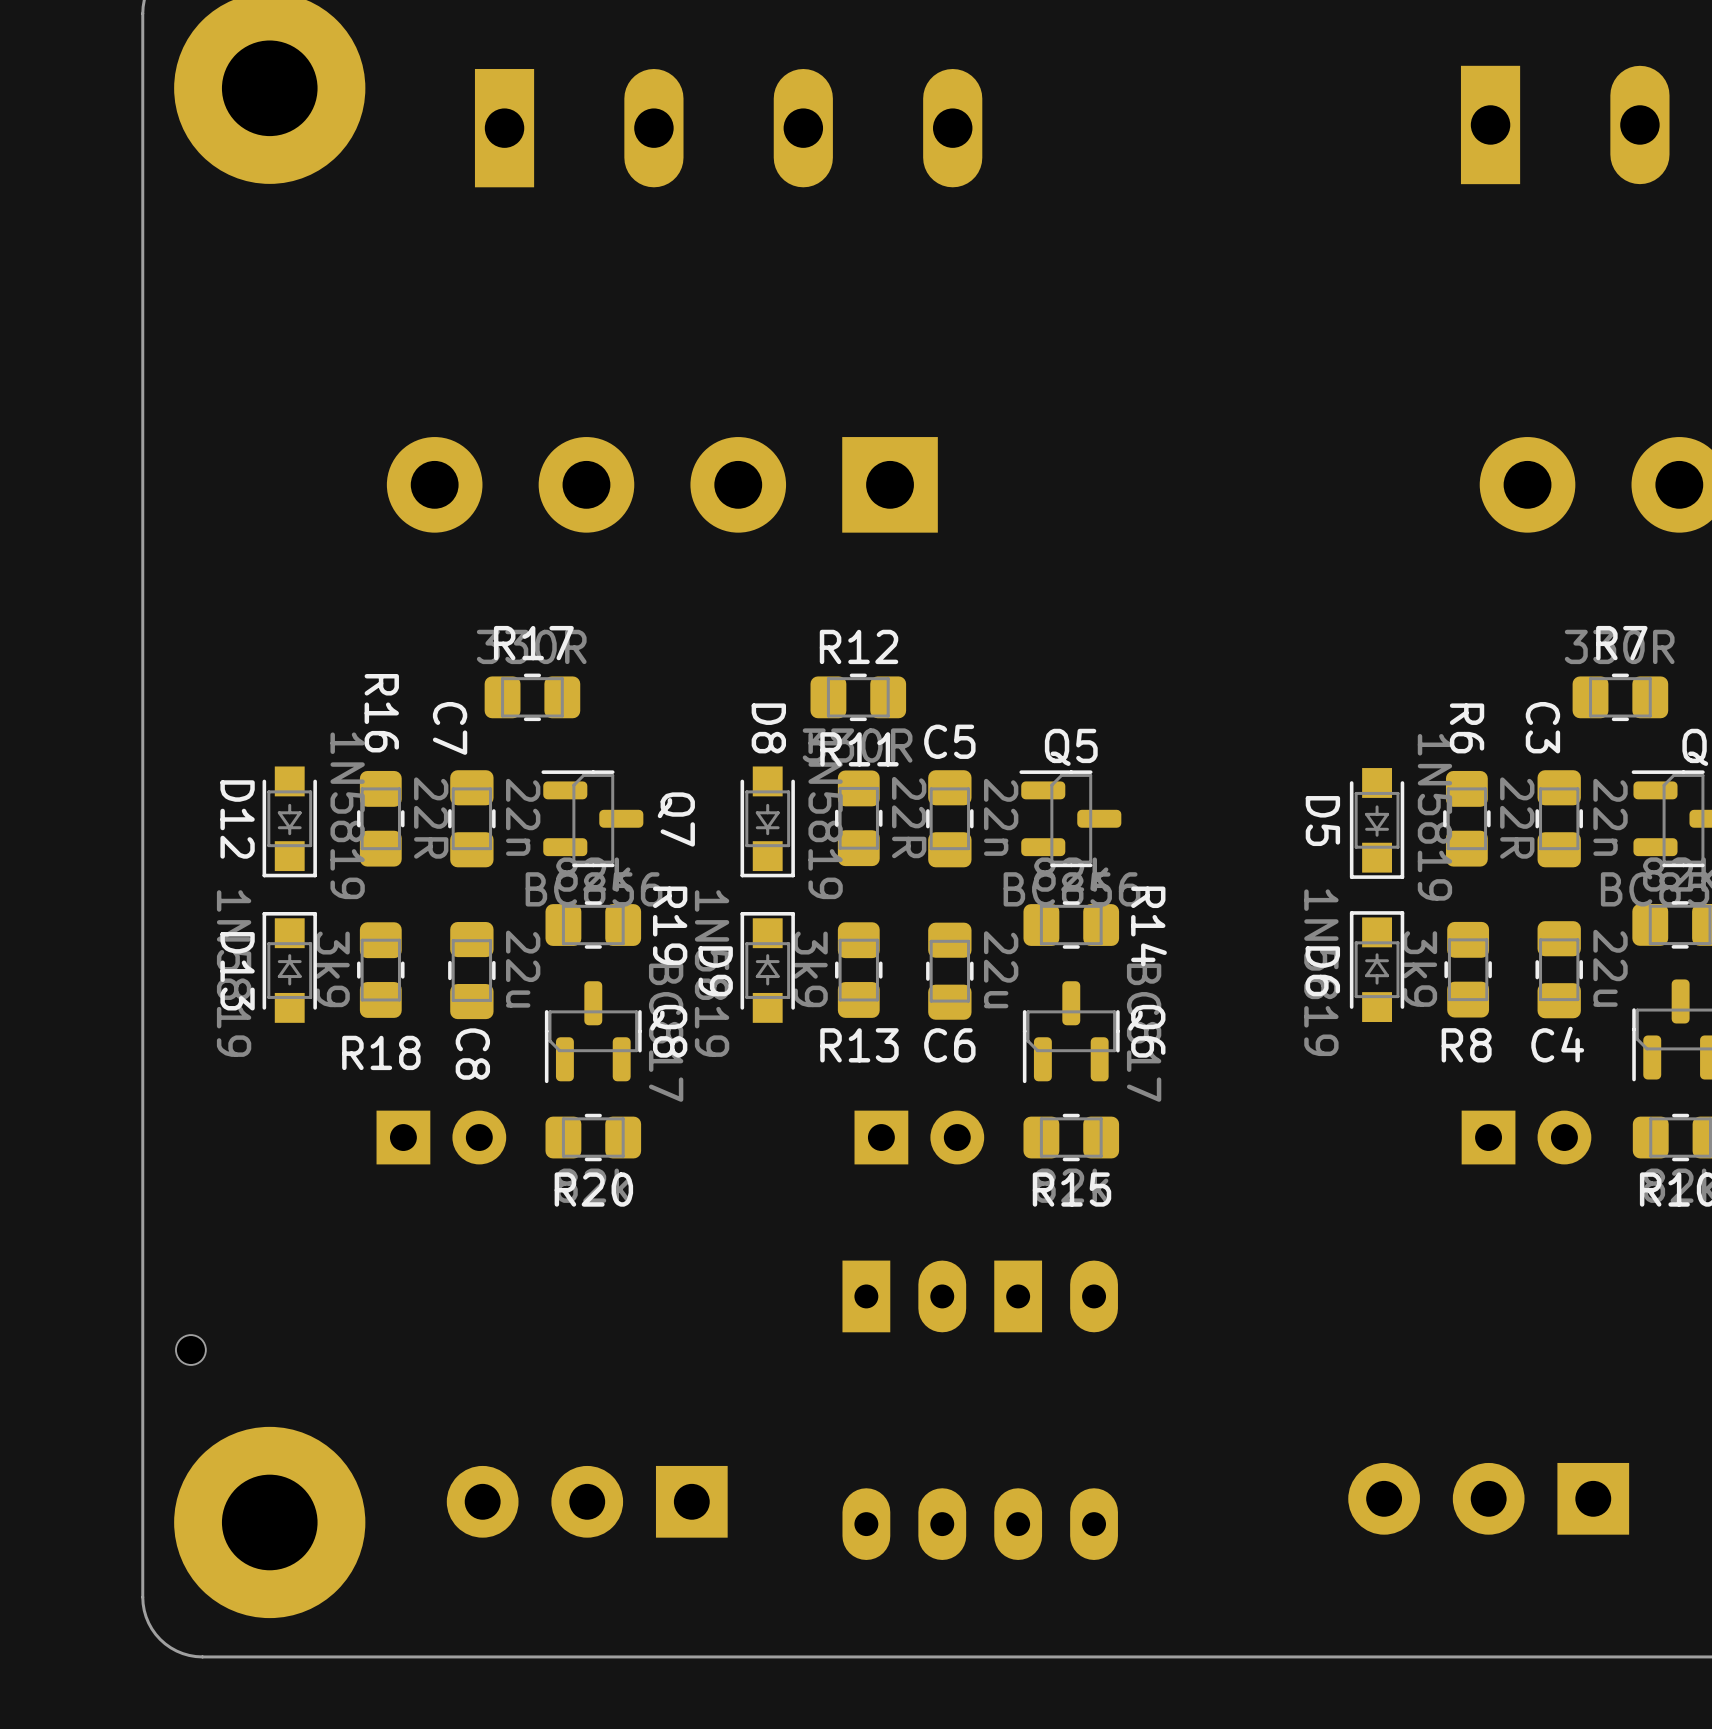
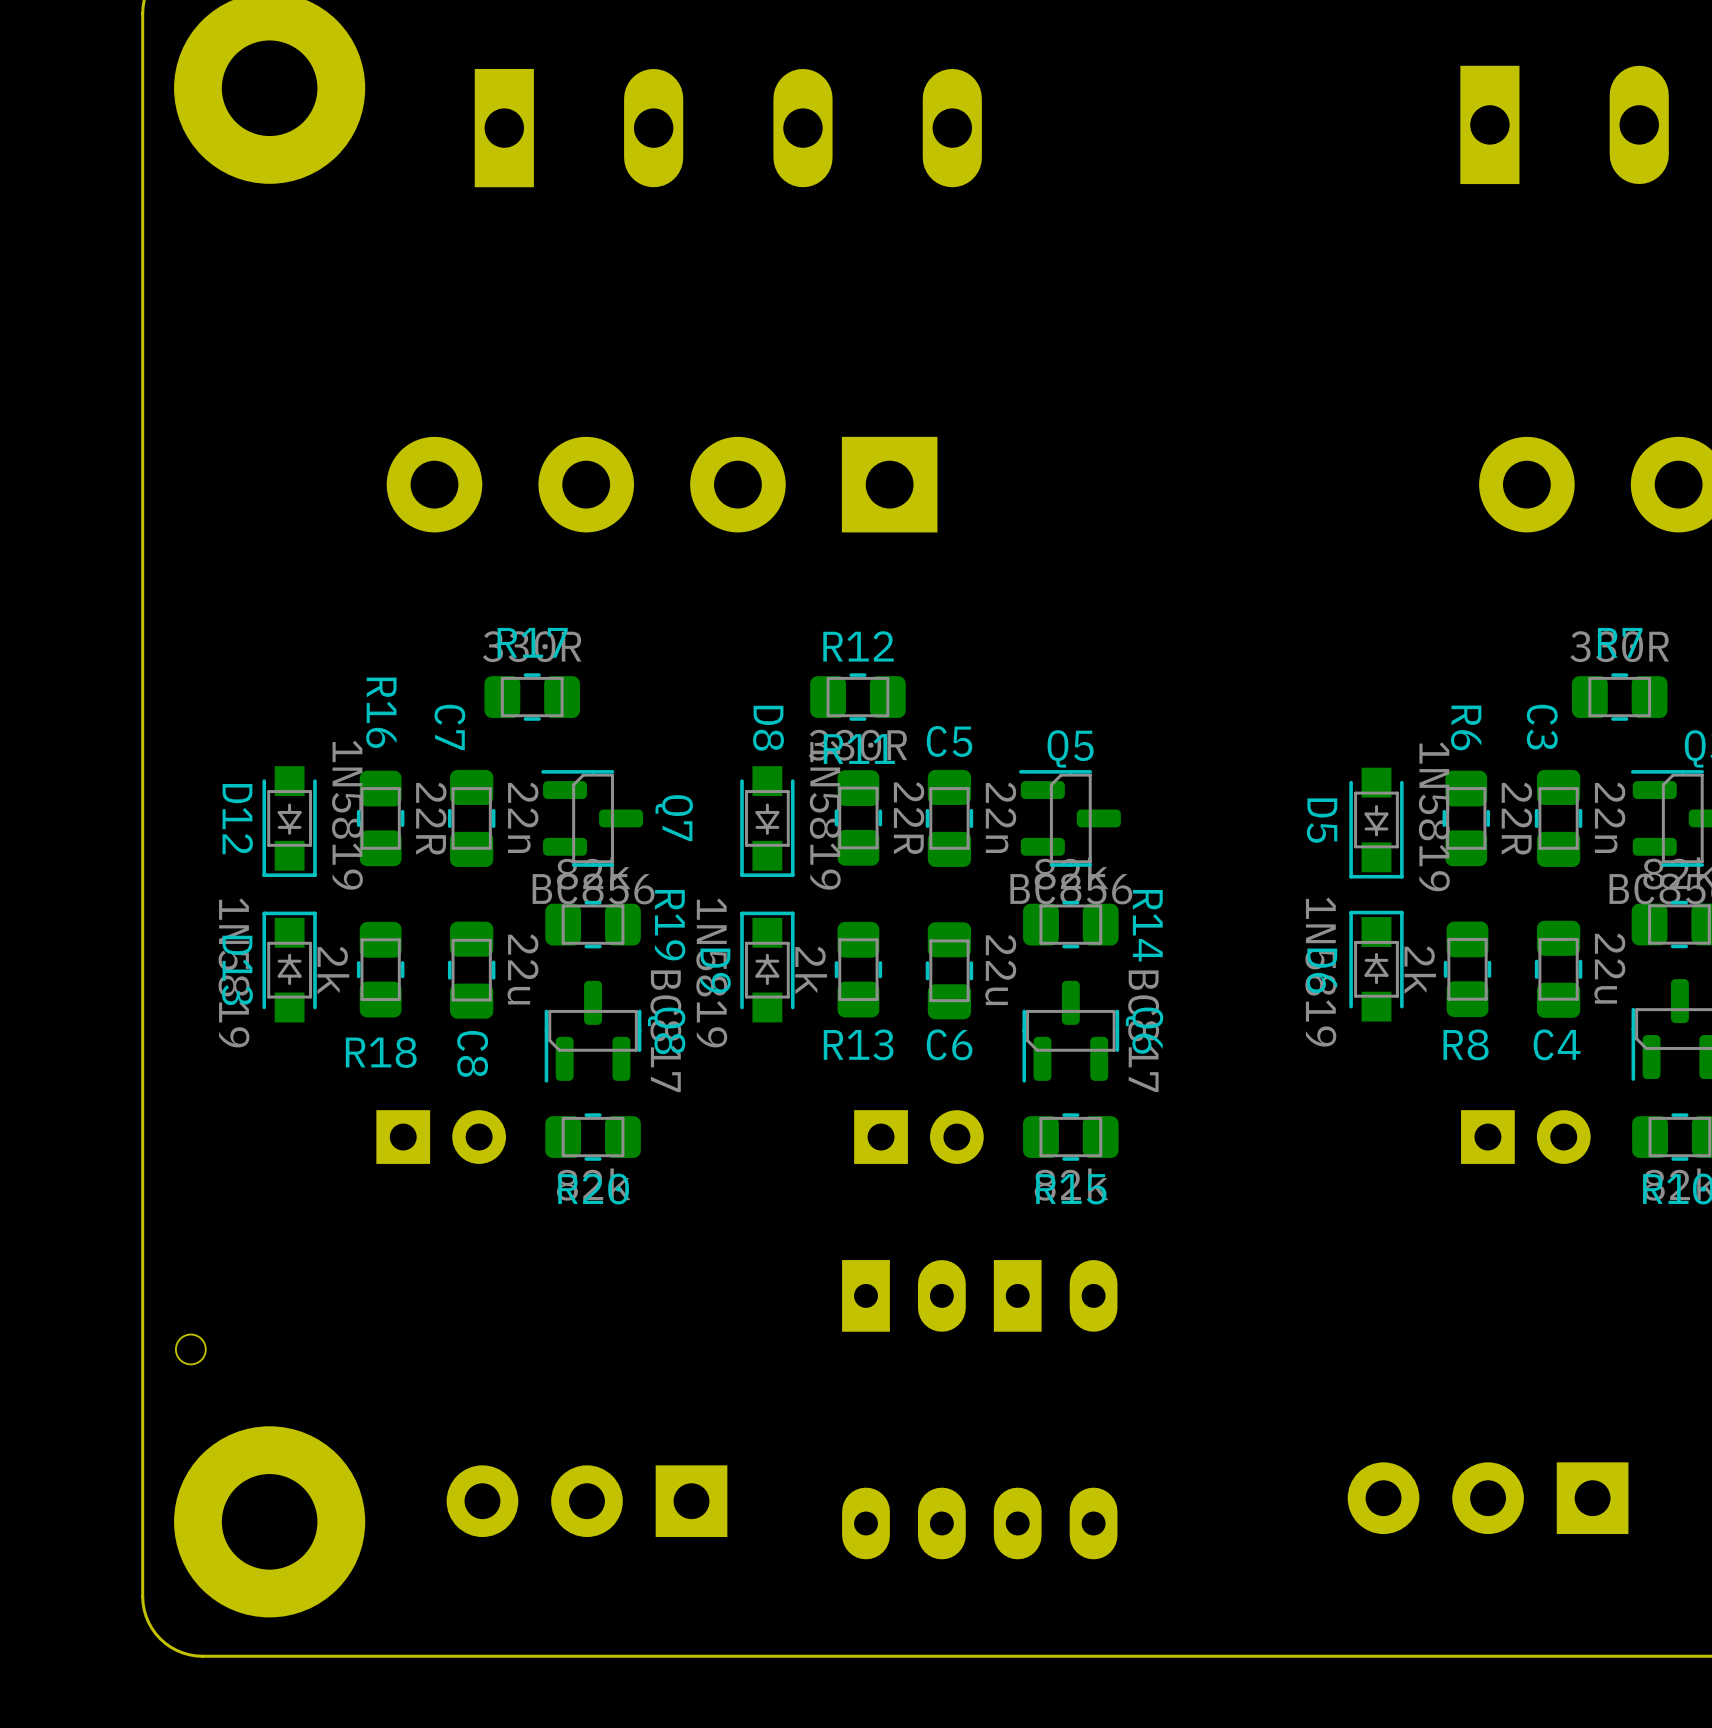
R18 value: 3k9 (332, 969) -> 2k (333, 970)
R13 value: 3k9 (810, 969) -> 2k (811, 970)
R8 value: 3k9 (1419, 969) -> 2k (1420, 970)

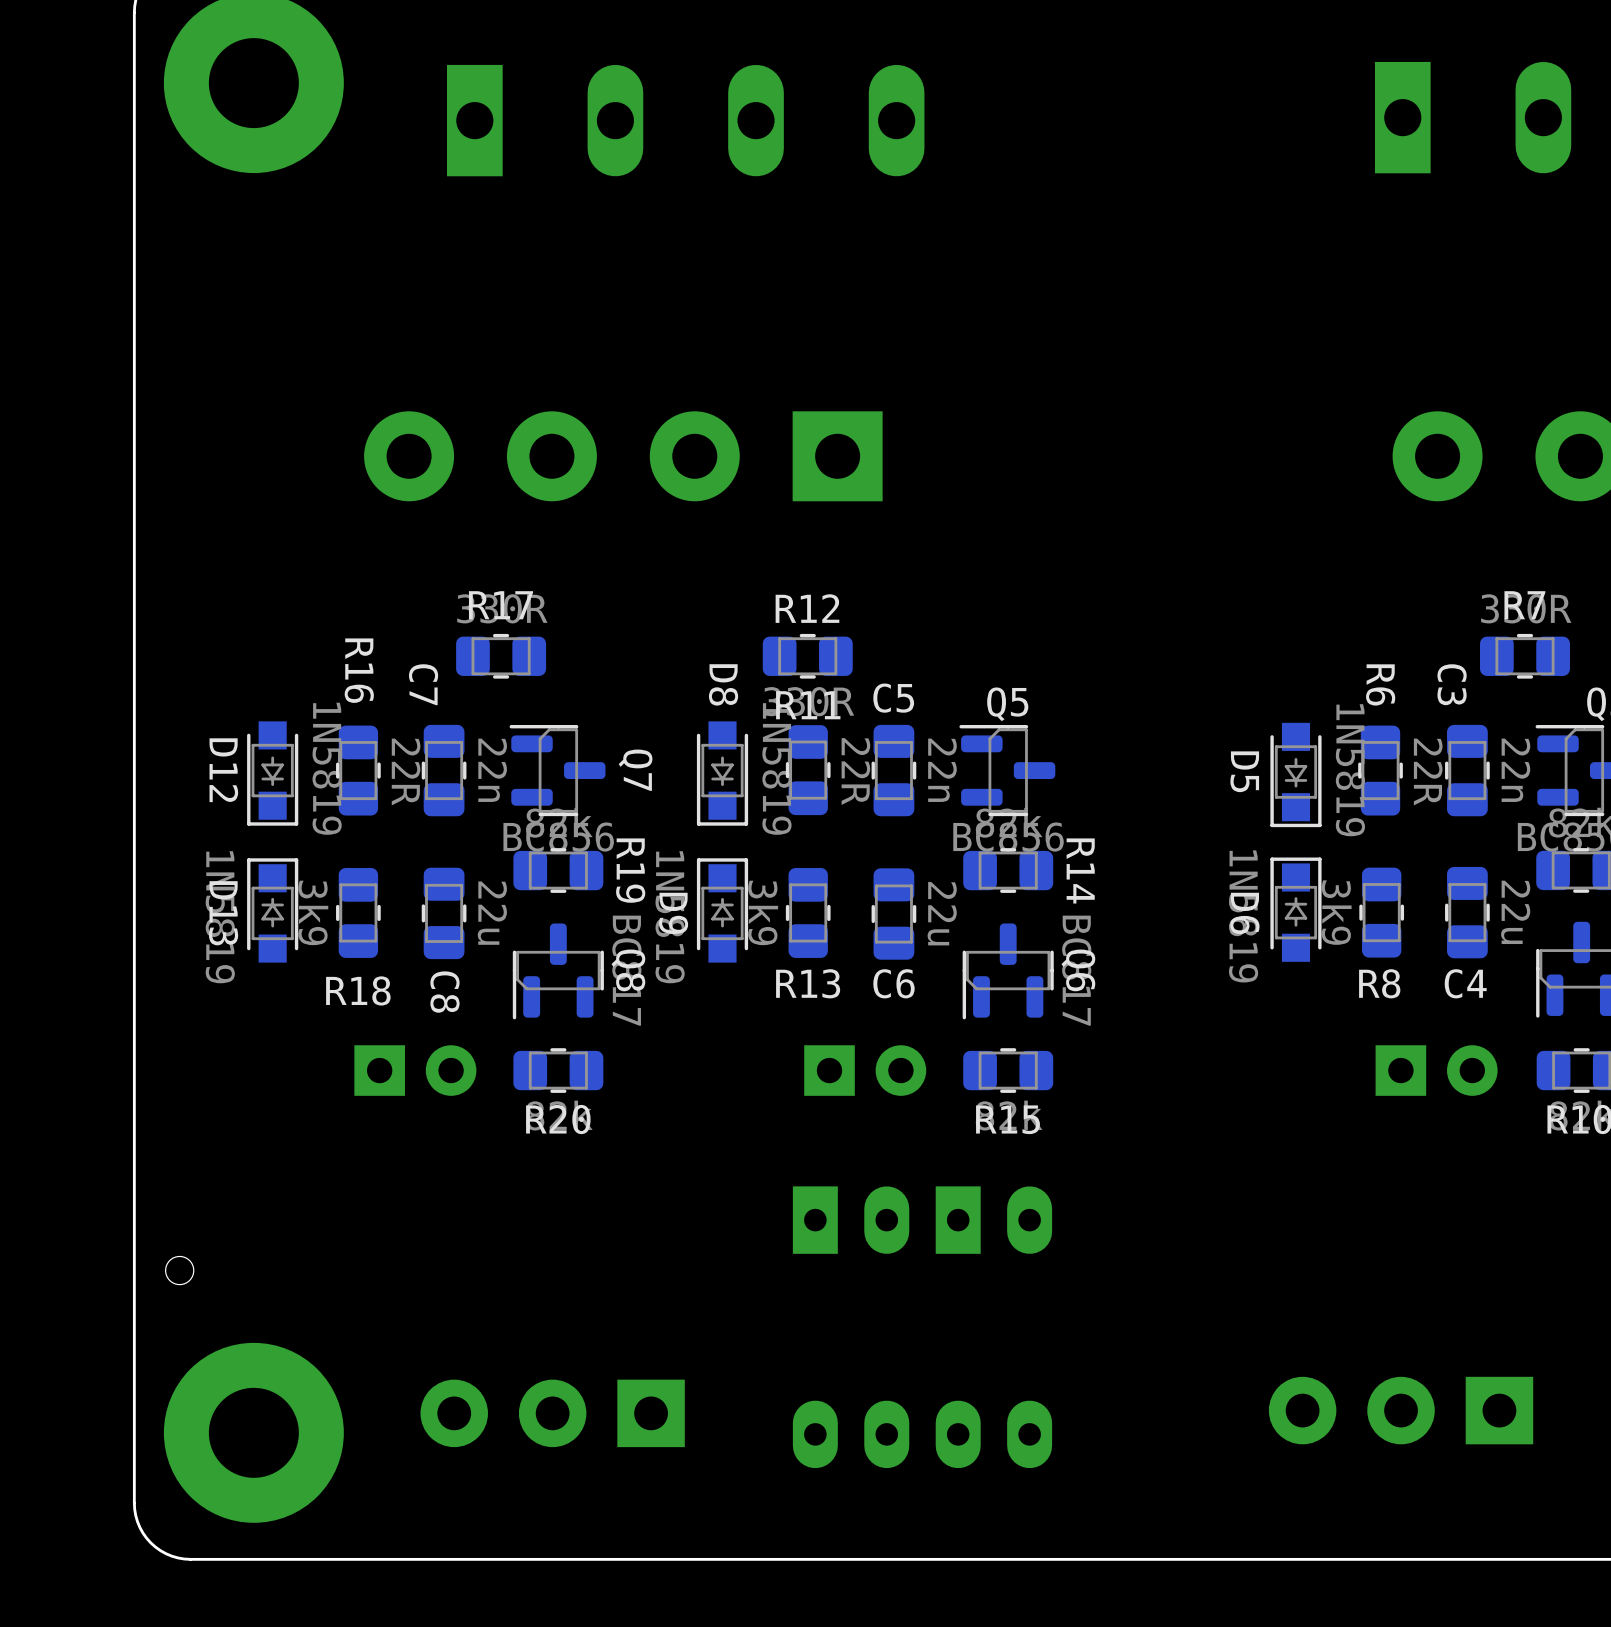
R18 value: 2k (333, 970) -> 3k9 (313, 912)
R13 value: 2k (811, 970) -> 3k9 (763, 912)
R8 value: 2k (1420, 970) -> 3k9 (1336, 912)

